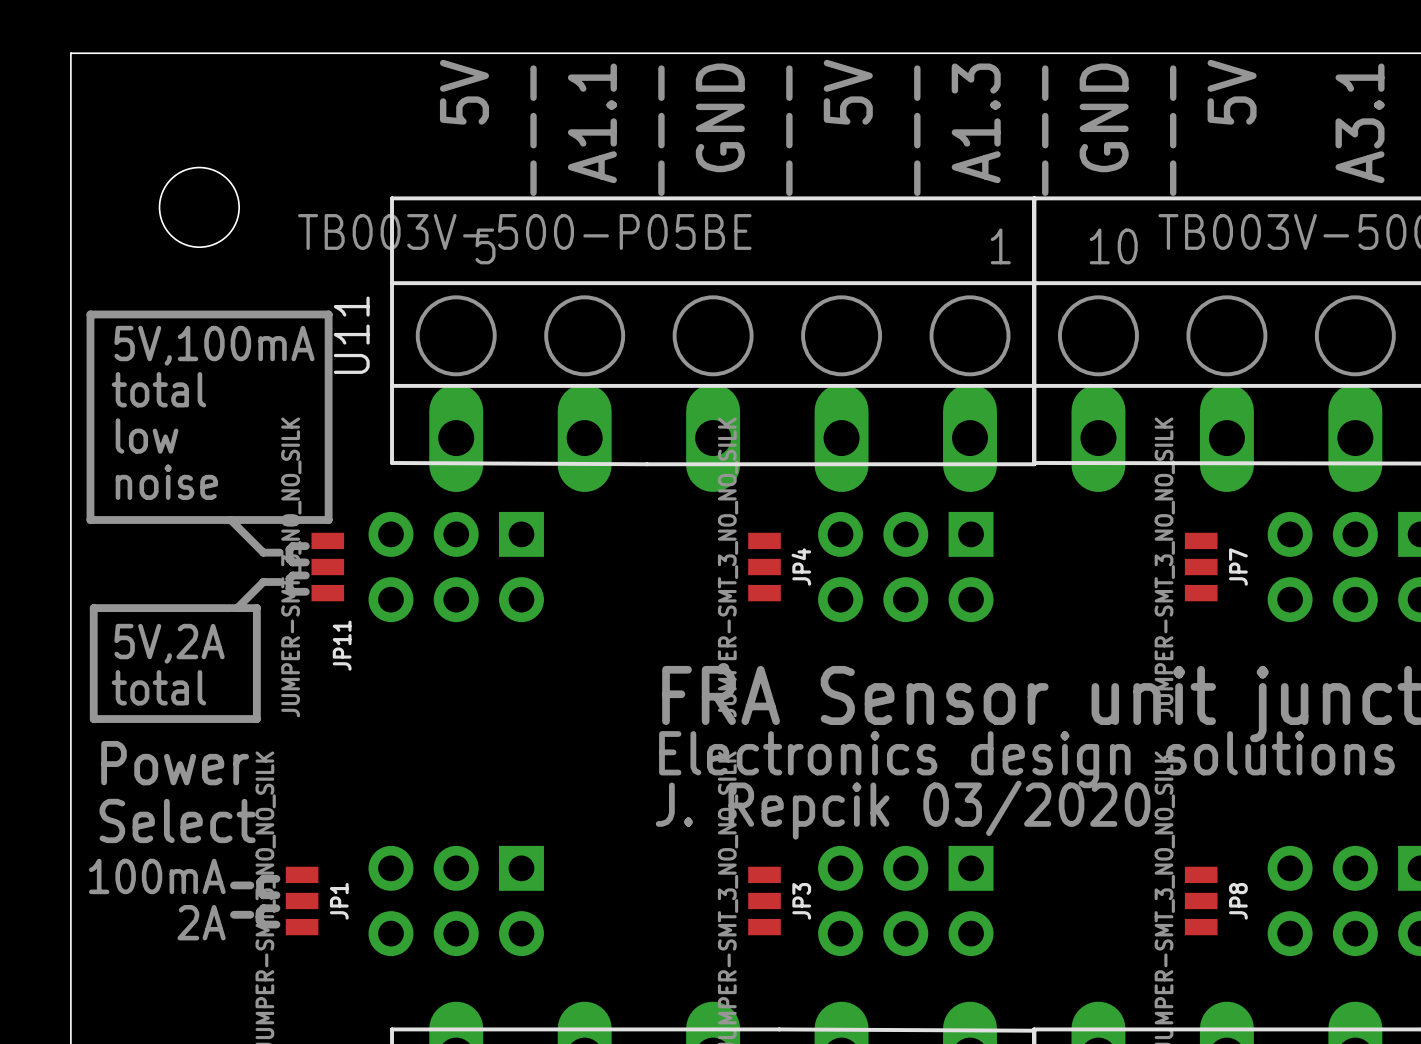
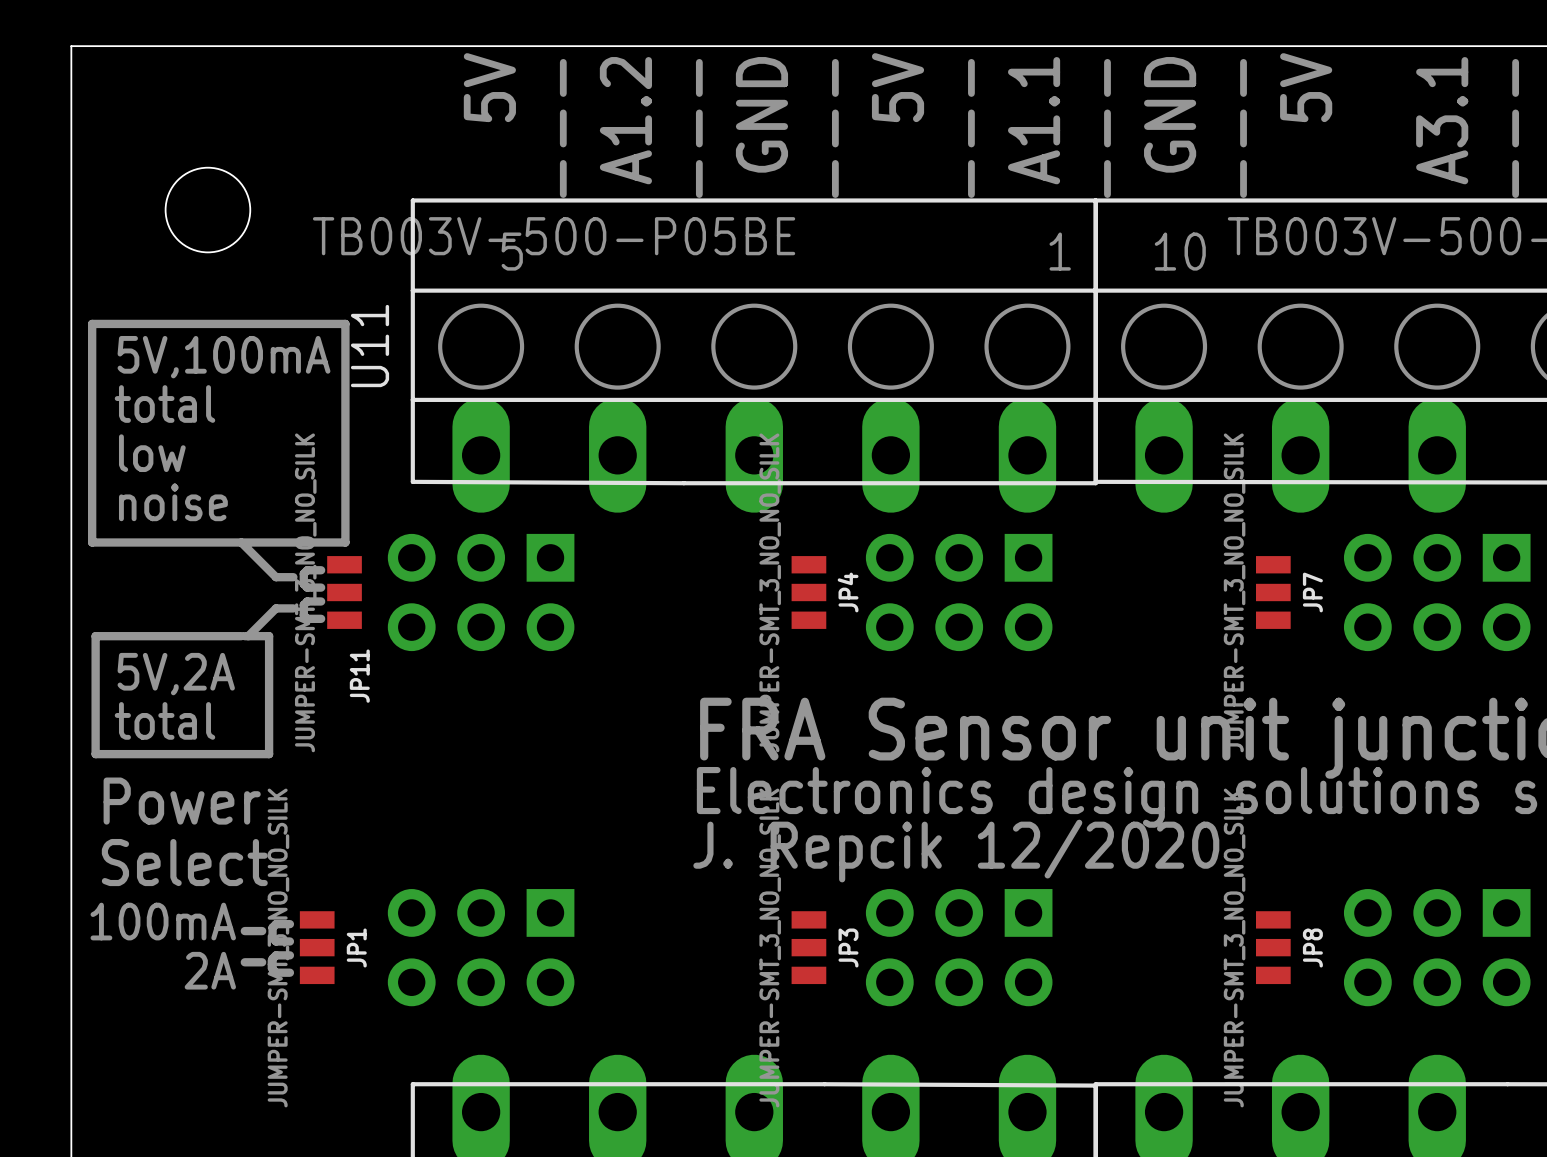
text: A1.1 (592, 123) -> A1.2 (625, 120)
text: A1.3 (976, 123) -> A1.1 (1034, 120)
text: J. Repcik 03/2020 (903, 810) -> J. Repcik 12/2020 (956, 851)

